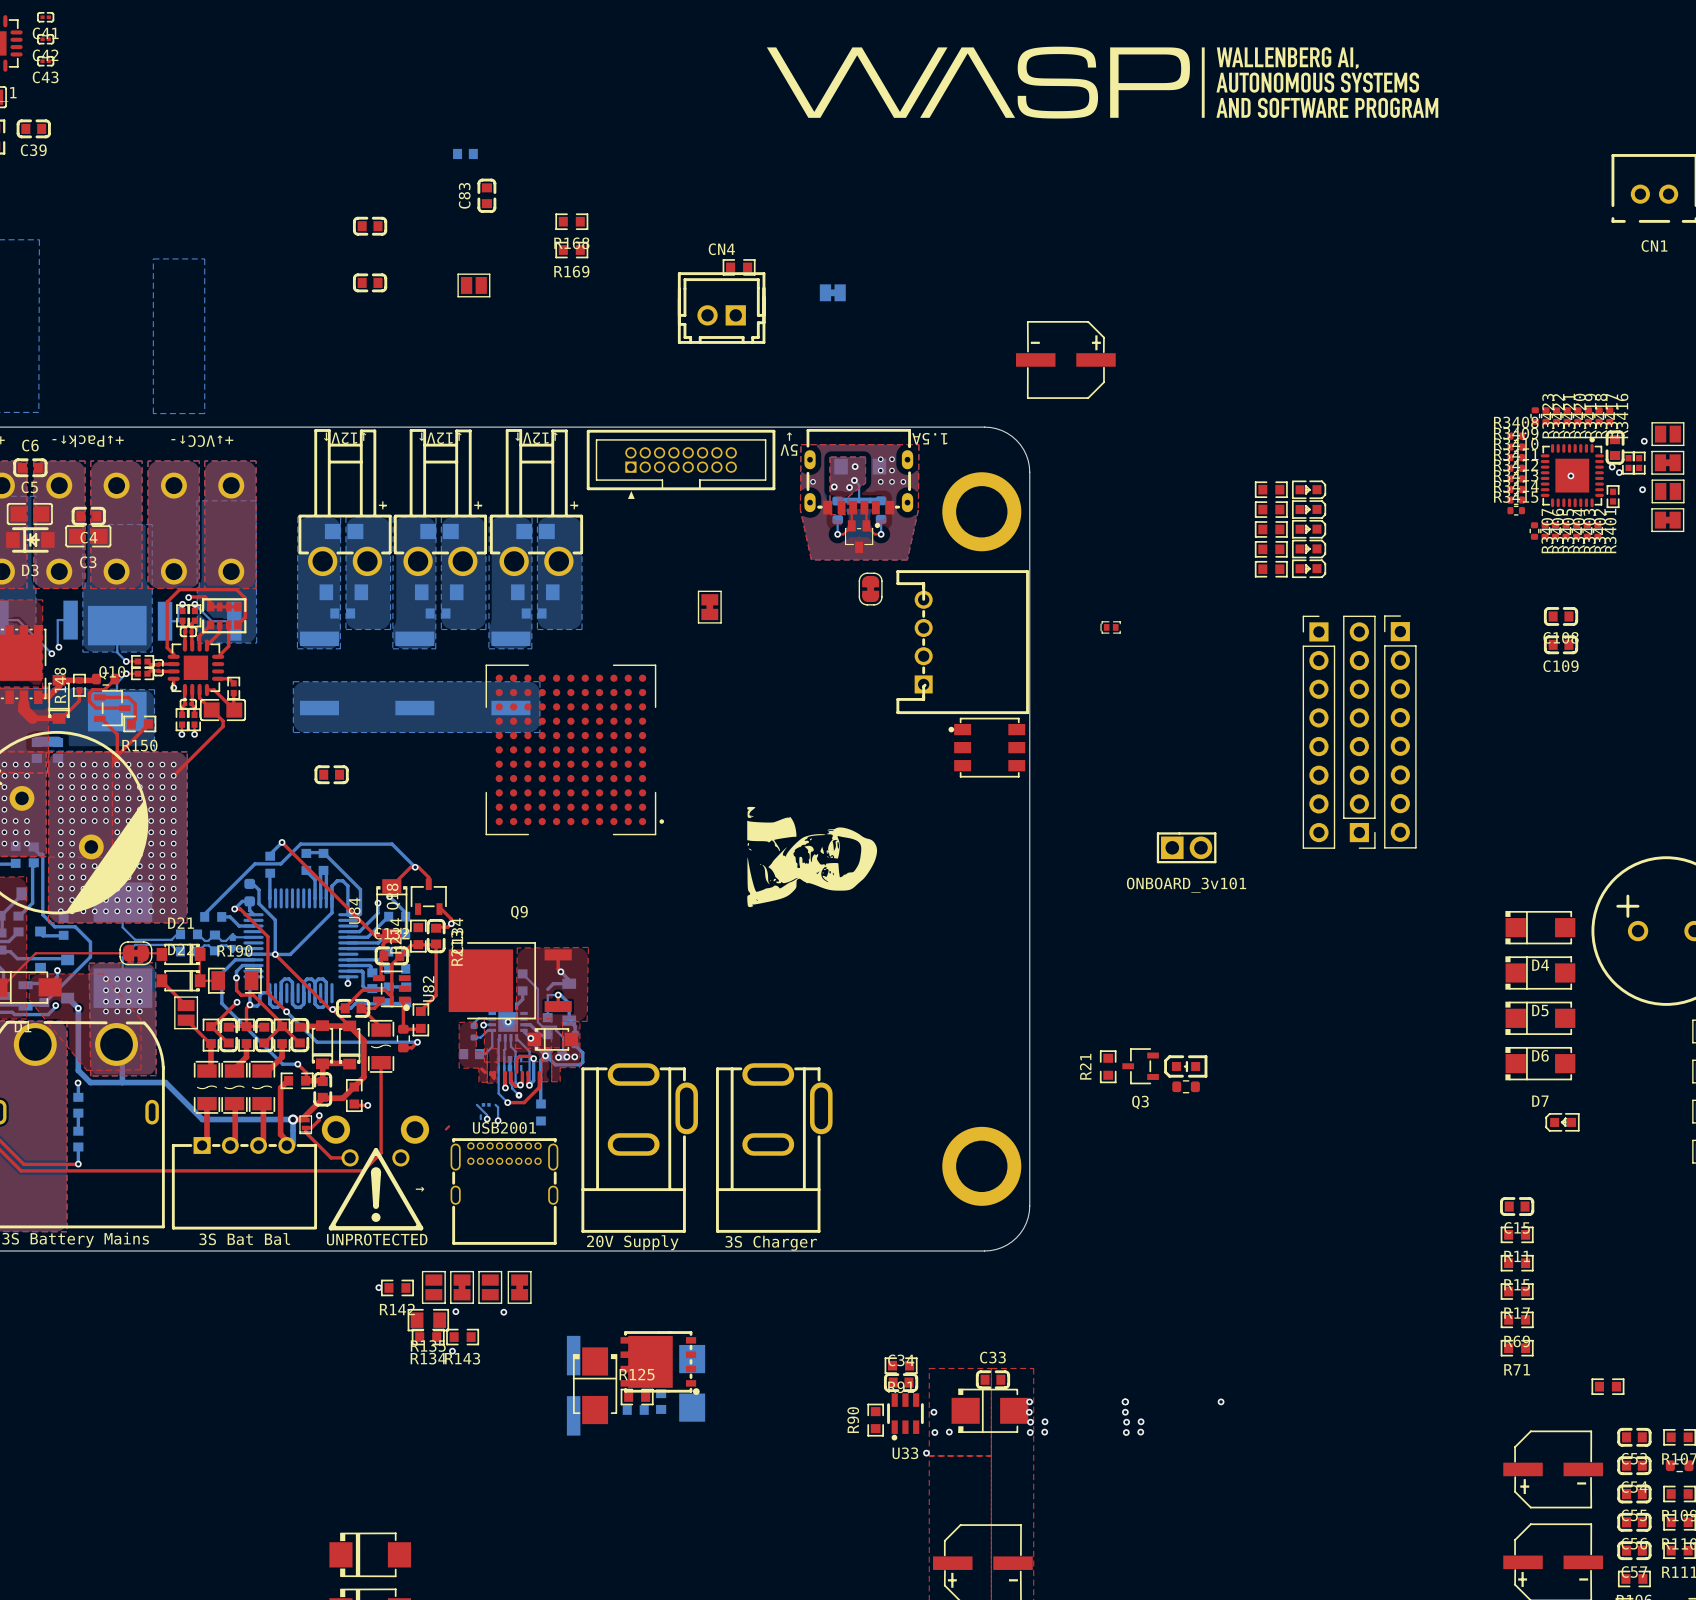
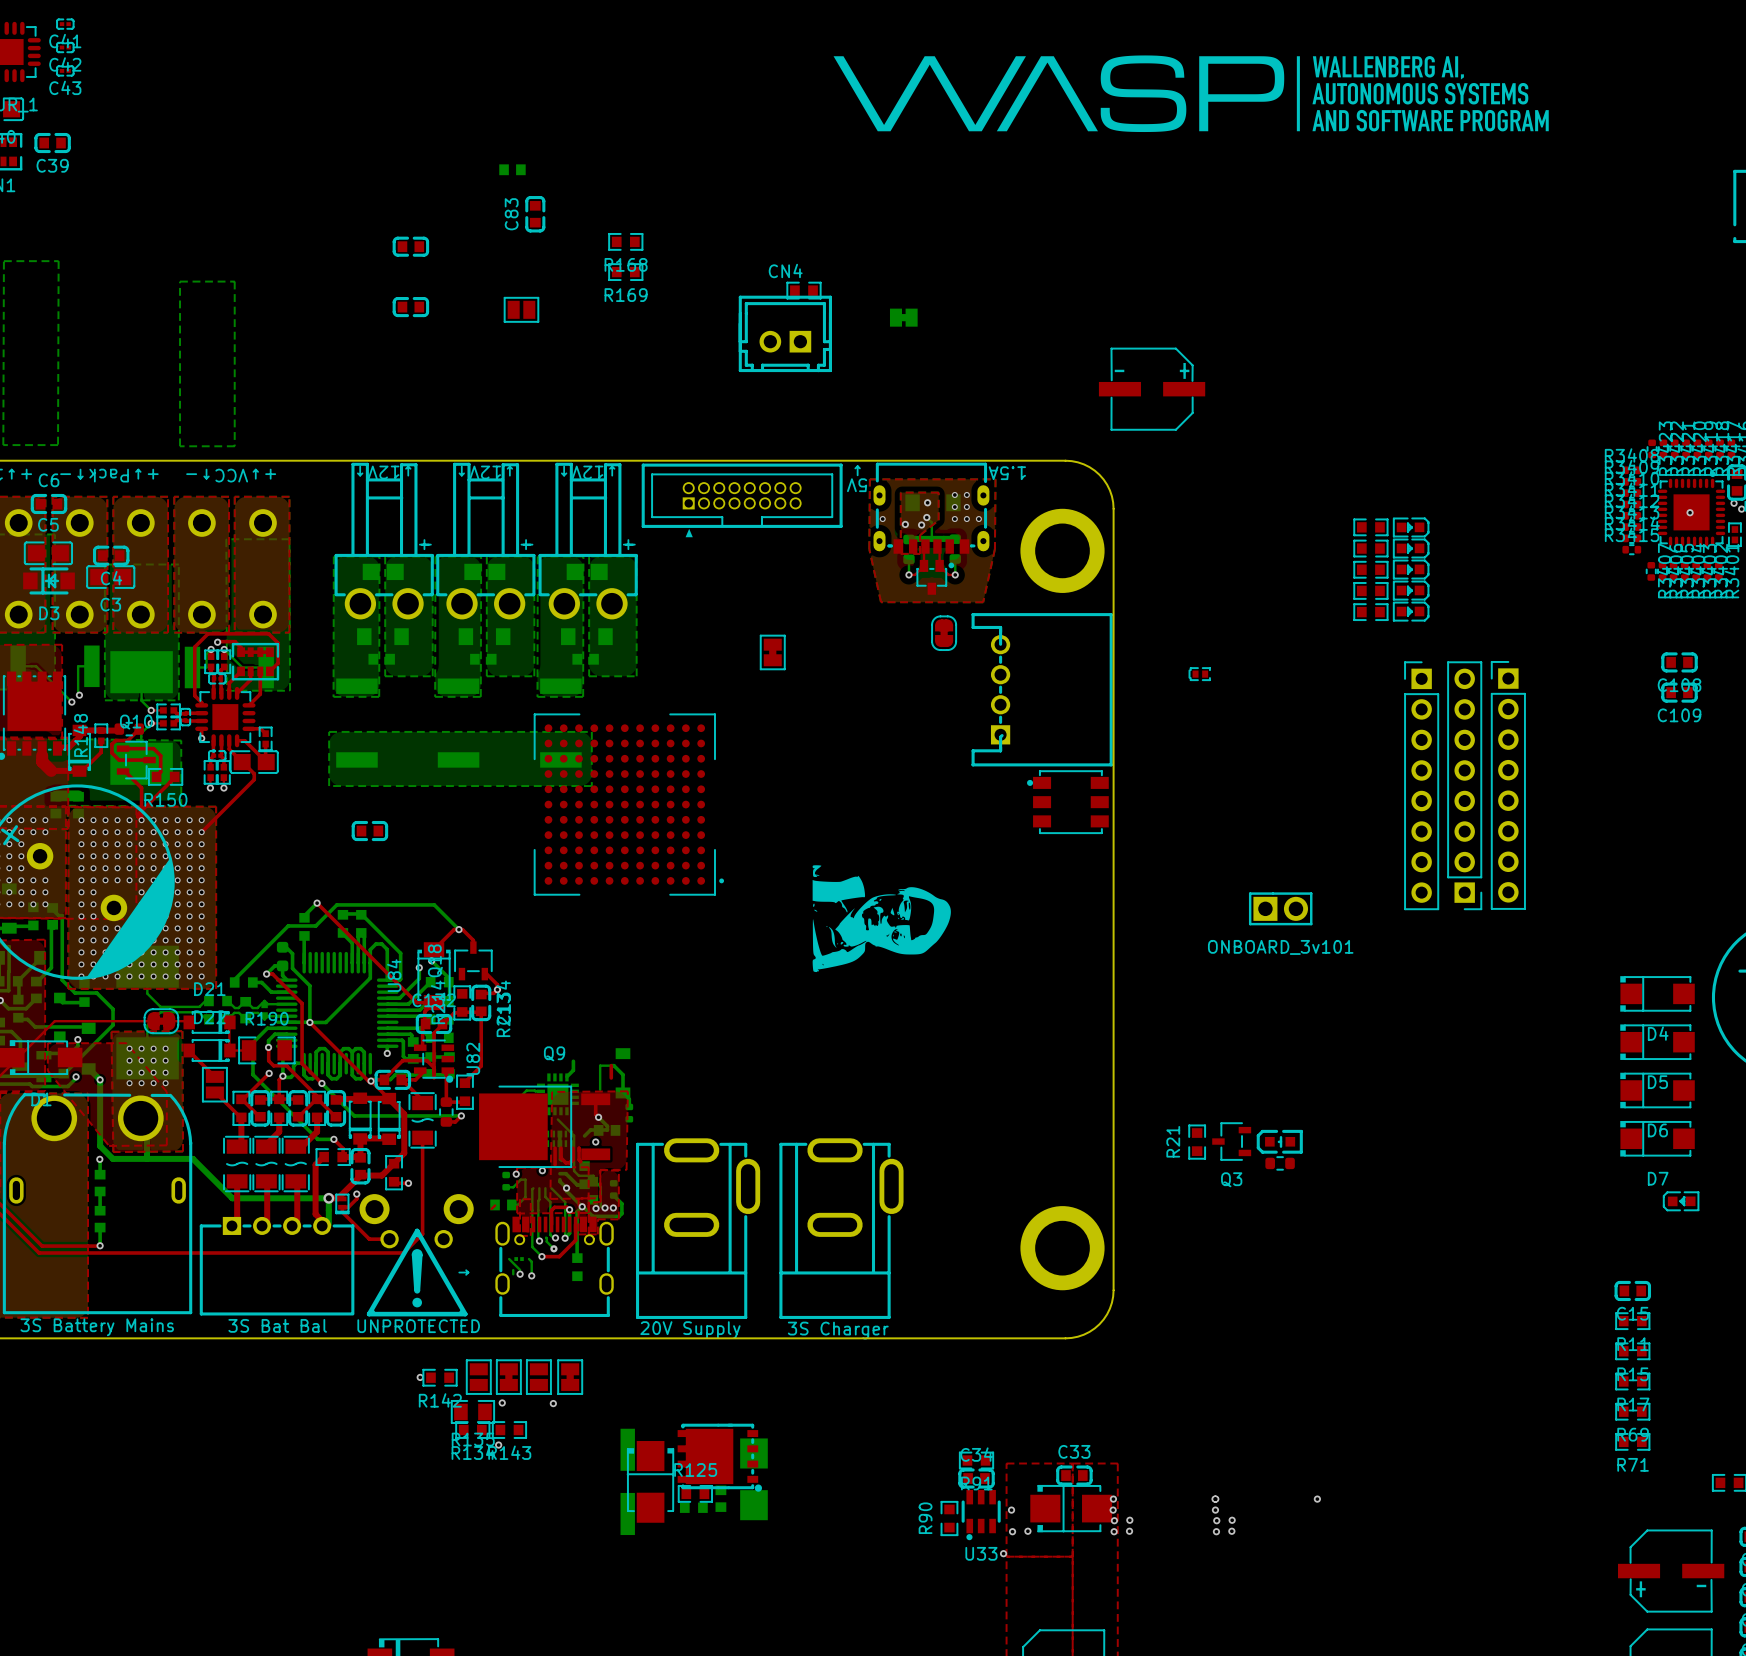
top track: (558, 954) (558, 969) (560, 971) -> (595, 1099) (595, 1114) (598, 1117)
bottom track: (560, 971) (569, 980) (569, 983) (553, 983) (547, 989) -> (598, 1117) (607, 1126) (607, 1129) (590, 1129) (584, 1135)
via: (560, 971) -> none
bottom track: (522, 973) (537, 989) (537, 1022) (542, 1026) (556, 1026) (556, 1030) (563, 1037) (563, 1055) -> (557, 1119) (574, 1135) (574, 1171) (578, 1175) (593, 1175) (593, 1179) (600, 1187) (600, 1206)
Q9 position: (510, 980) -> (544, 1126)
part: (522, 982) -> none
via: (558, 995) -> none
top zone outline: (551, 1018) (551, 1061) (484, 1062) (484, 1019) (502, 1019) -> (600, 1170) (600, 1198) (550, 1198) (552, 1091)
top zone outline: none -> (604, 1090) (627, 1091) (626, 1170) (600, 1170)
top zone outline: (476, 1021) (459, 1022) (459, 1068) (478, 1068) (478, 1082) (487, 1082) (487, 1052) (476, 1051) (476, 1021) -> none
via: (508, 1021) -> none
top zone outline: (562, 1021) (579, 1021) (579, 1067) (560, 1067) (560, 1081) (542, 1081) (542, 1047) (551, 1047) (551, 1081) (551, 1051) (563, 1051) (562, 1021) -> (600, 1170) (618, 1170) (618, 1219) (597, 1219) (597, 1234) (578, 1234) (578, 1198) (588, 1198) (588, 1234) (588, 1202) (600, 1201) (600, 1170)
top zone outline: (562, 1021) (562, 1047) (515, 1048) (517, 948) (588, 947) (587, 1021) (562, 1021) -> none
bottom track: (524, 1024) (530, 1024) (540, 1035) (547, 1035) -> (559, 1173) (565, 1173) (577, 1185) (584, 1185)
via: (483, 1025) -> none
part: (547, 1026) -> none
bottom track: (524, 1030) (530, 1041) (545, 1055) (540, 1060) (540, 1104) -> (559, 1179) (566, 1188) (566, 1191) (582, 1206) (577, 1211) (577, 1258)
part: (474, 1031) -> none
bottom track: (474, 1037) (480, 1037) (487, 1030) (492, 1030) (492, 1046) (485, 1054) (479, 1054) -> (506, 1187) (513, 1187) (520, 1179) (525, 1179) (525, 1197) (517, 1204) (511, 1204)
bottom track: (499, 1038) (498, 1093) (507, 1102) -> (533, 1188) (532, 1247) (541, 1256)
bottom track: (505, 1038) (505, 1087) -> (539, 1188) (539, 1240)
bottom track: (510, 1038) (510, 1046) (515, 1051) (515, 1082) (520, 1085) -> (545, 1188) (545, 1196) (550, 1201) (550, 1234) (555, 1237)
bottom track: (516, 1038) (529, 1051) (529, 1083) (527, 1084) (529, 1085) (533, 1080) (533, 1058) -> (551, 1188) (565, 1202) (565, 1235) (563, 1237) (565, 1238) (569, 1233) (569, 1209)
via: (530, 1038) -> none
part: (552, 1039) -> none
via: none -> (598, 1117)
bottom track: (575, 1045) (582, 1052) (582, 1062) (580, 1064) (555, 1064) (546, 1055) -> (613, 1195) (621, 1203) (621, 1213) (619, 1216) (592, 1216) (583, 1206)
top zone outline: (487, 1048) (497, 1048) (497, 1083) (487, 1083) (487, 1048) -> (519, 1199) (530, 1199) (530, 1235) (519, 1235) (519, 1199)
part position: (471, 1054) -> (503, 1204)
via: (545, 1055) -> none
via: (566, 1056) -> none
via: (574, 1056) -> none
via: (558, 1057) -> none
top track: (533, 1058) (531, 1056) (519, 1056) (516, 1059) (516, 1072) -> (569, 1209) (567, 1207) (554, 1207) (551, 1210) (551, 1224)
via: (533, 1058) -> none
via: none -> (595, 1142)
top track: (539, 1072) (539, 1087) (524, 1102) (507, 1102) -> (575, 1224) (575, 1240) (559, 1256) (541, 1256)
bottom track: (511, 1084) (512, 1088) (518, 1095) -> (546, 1237) (546, 1241) (553, 1248)
via: (520, 1085) -> none
via: (529, 1085) -> none
via: (505, 1087) -> none
top zone outline: none -> (588, 1167) (588, 1212) (517, 1213) (517, 1167) (588, 1167)
via: none -> (542, 1170)
via: (518, 1095) -> none
via: none -> (516, 1174)
part: none -> (584, 1175)
via: (507, 1102) -> none
part: none -> (506, 1181)
bottom track: (476, 1104) (487, 1115) -> (509, 1259) (520, 1269)
part position: (486, 1104) -> (519, 1259)
bottom track: (495, 1104) (498, 1107) (498, 1120) -> (529, 1259) (531, 1261) (531, 1275)
via: none -> (566, 1188)
part: none -> (613, 1189)
bottom track: (480, 1115) (480, 1119) -> (513, 1270) (513, 1274)
via: (487, 1119) -> none
via: (498, 1120) -> none
via: none -> (582, 1206)
via: none -> (605, 1207)
via: none -> (613, 1207)
via: none -> (596, 1208)
via: none -> (569, 1209)
via: none -> (555, 1237)
via: none -> (565, 1238)
via: none -> (539, 1241)
via: none -> (553, 1248)
via: none -> (541, 1256)
part: none -> (554, 1266)
part: none -> (577, 1267)
via: none -> (520, 1274)
USB2001: (504, 1191) -> none
via: none -> (531, 1275)

